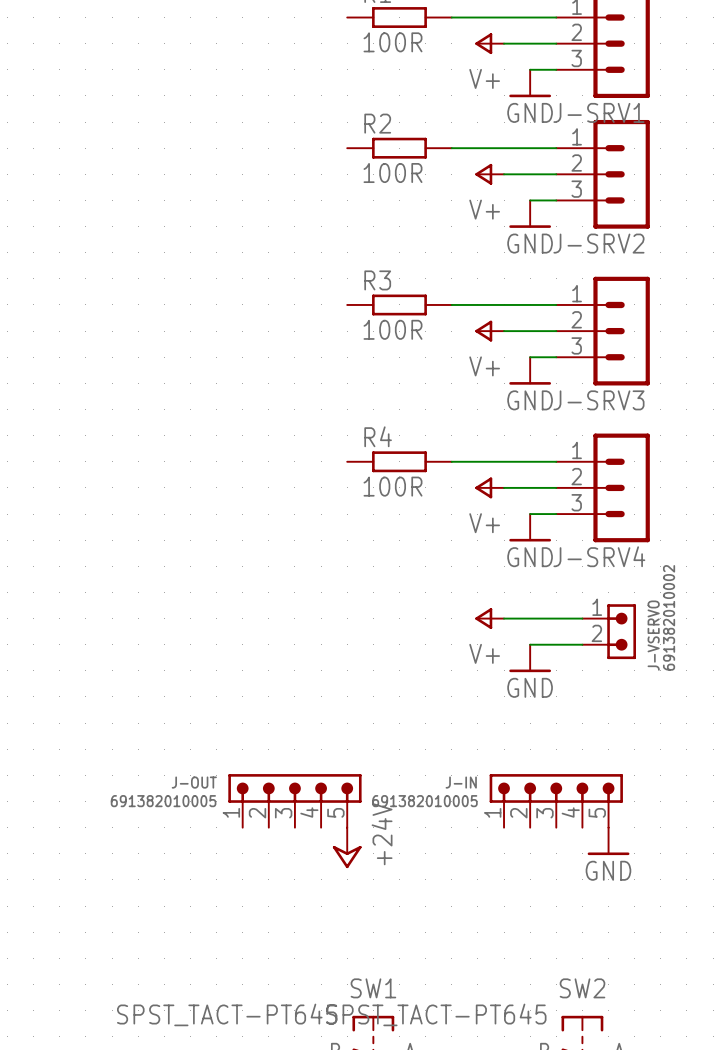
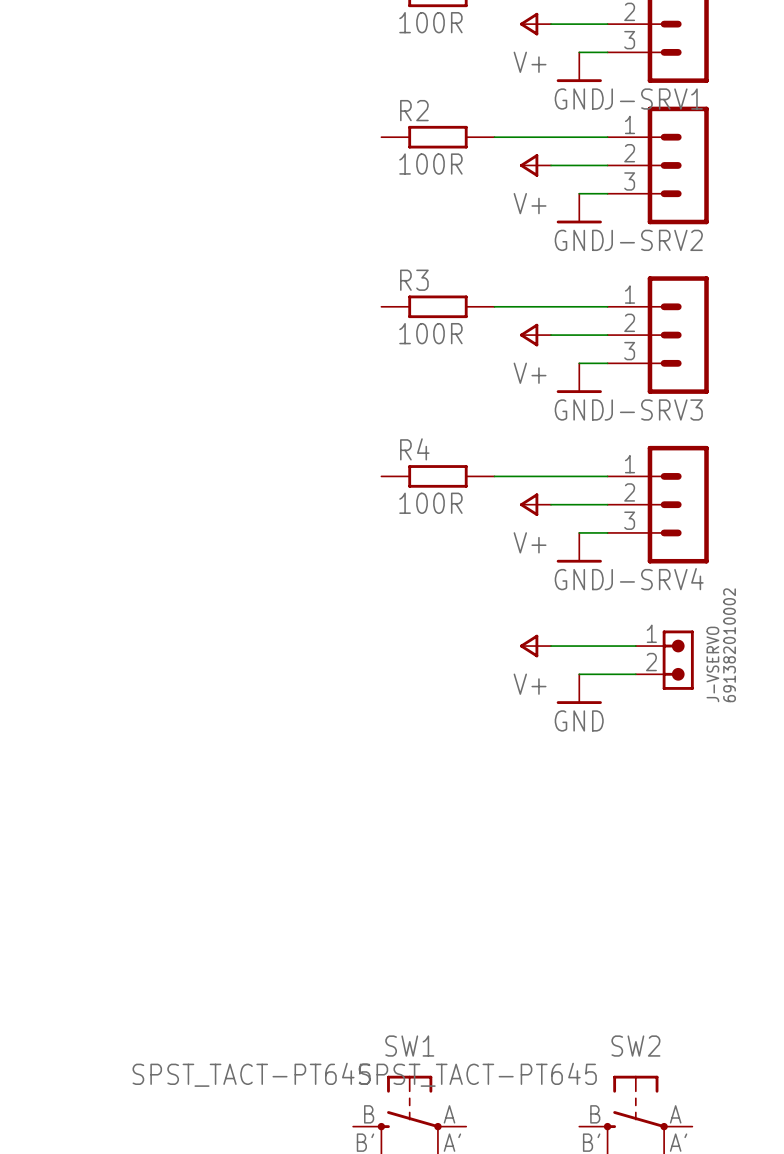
J-OUT: 691382010005 (294, 800) -> none
J-IN: 691382010005 (556, 800) -> none
power symbol: GND (608, 841) -> none
power symbol: +24V (347, 847) -> none

